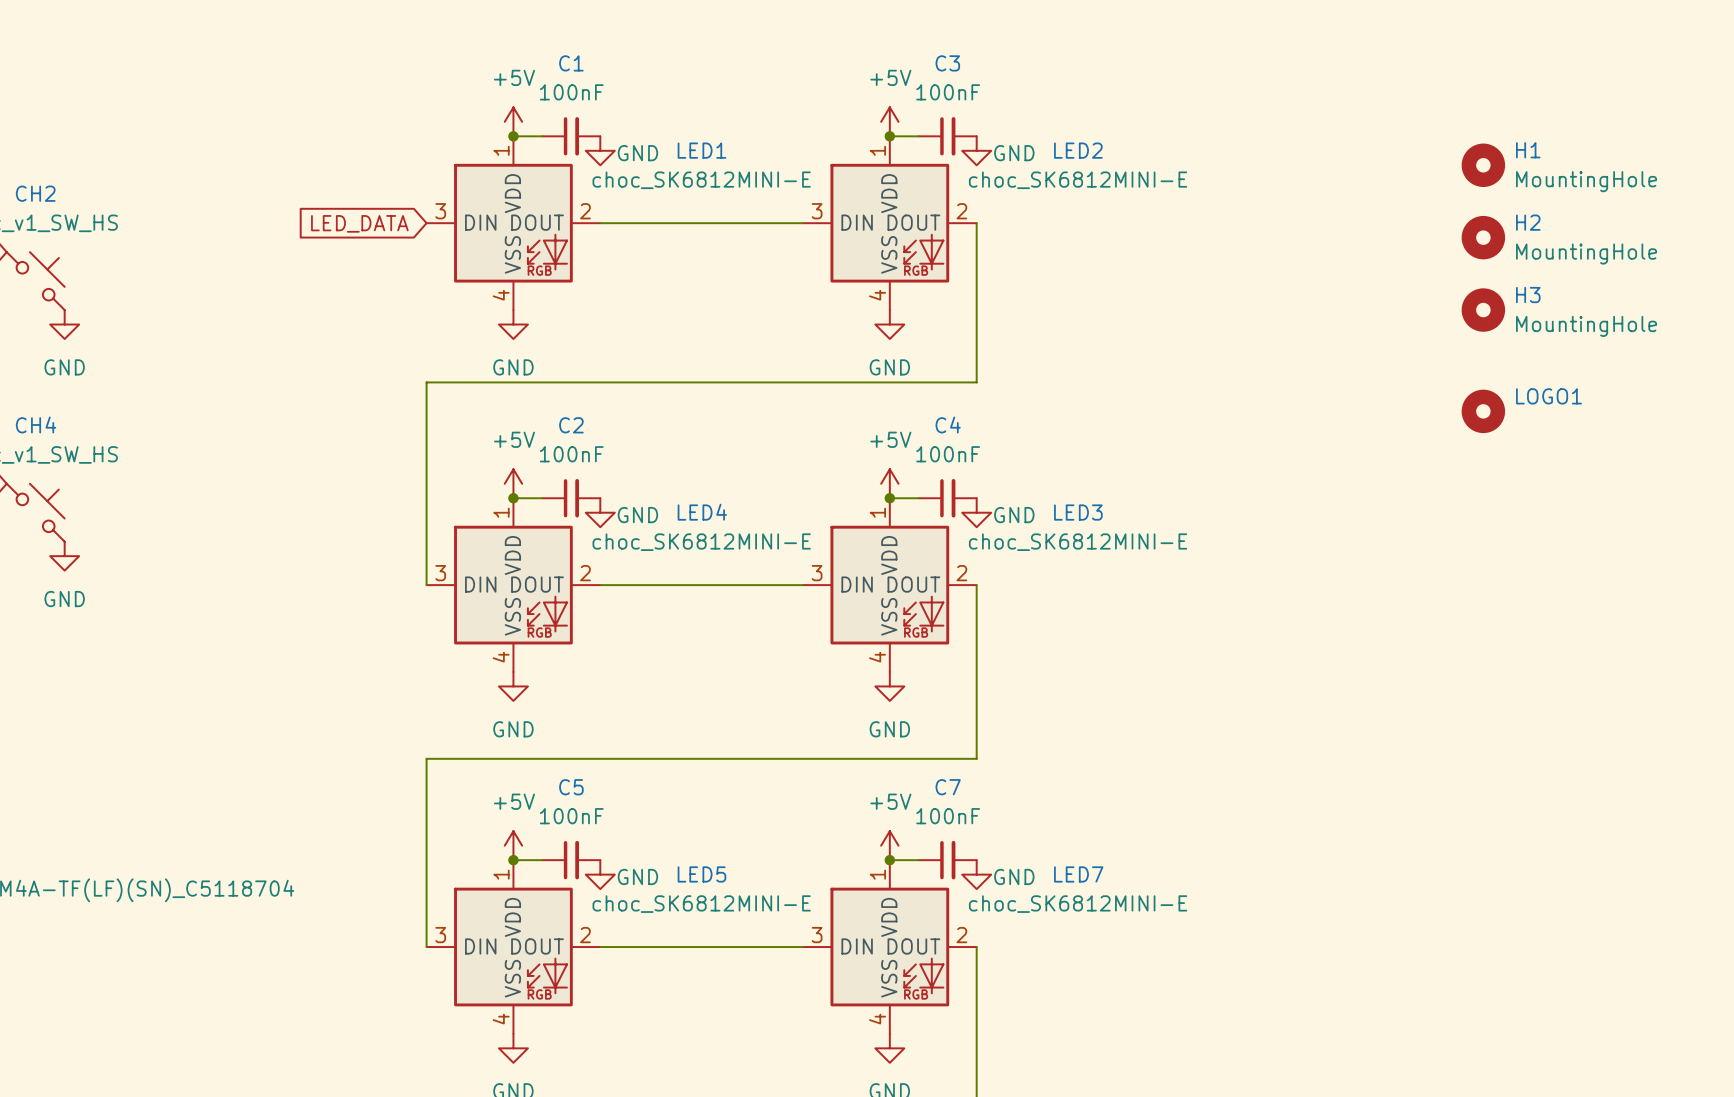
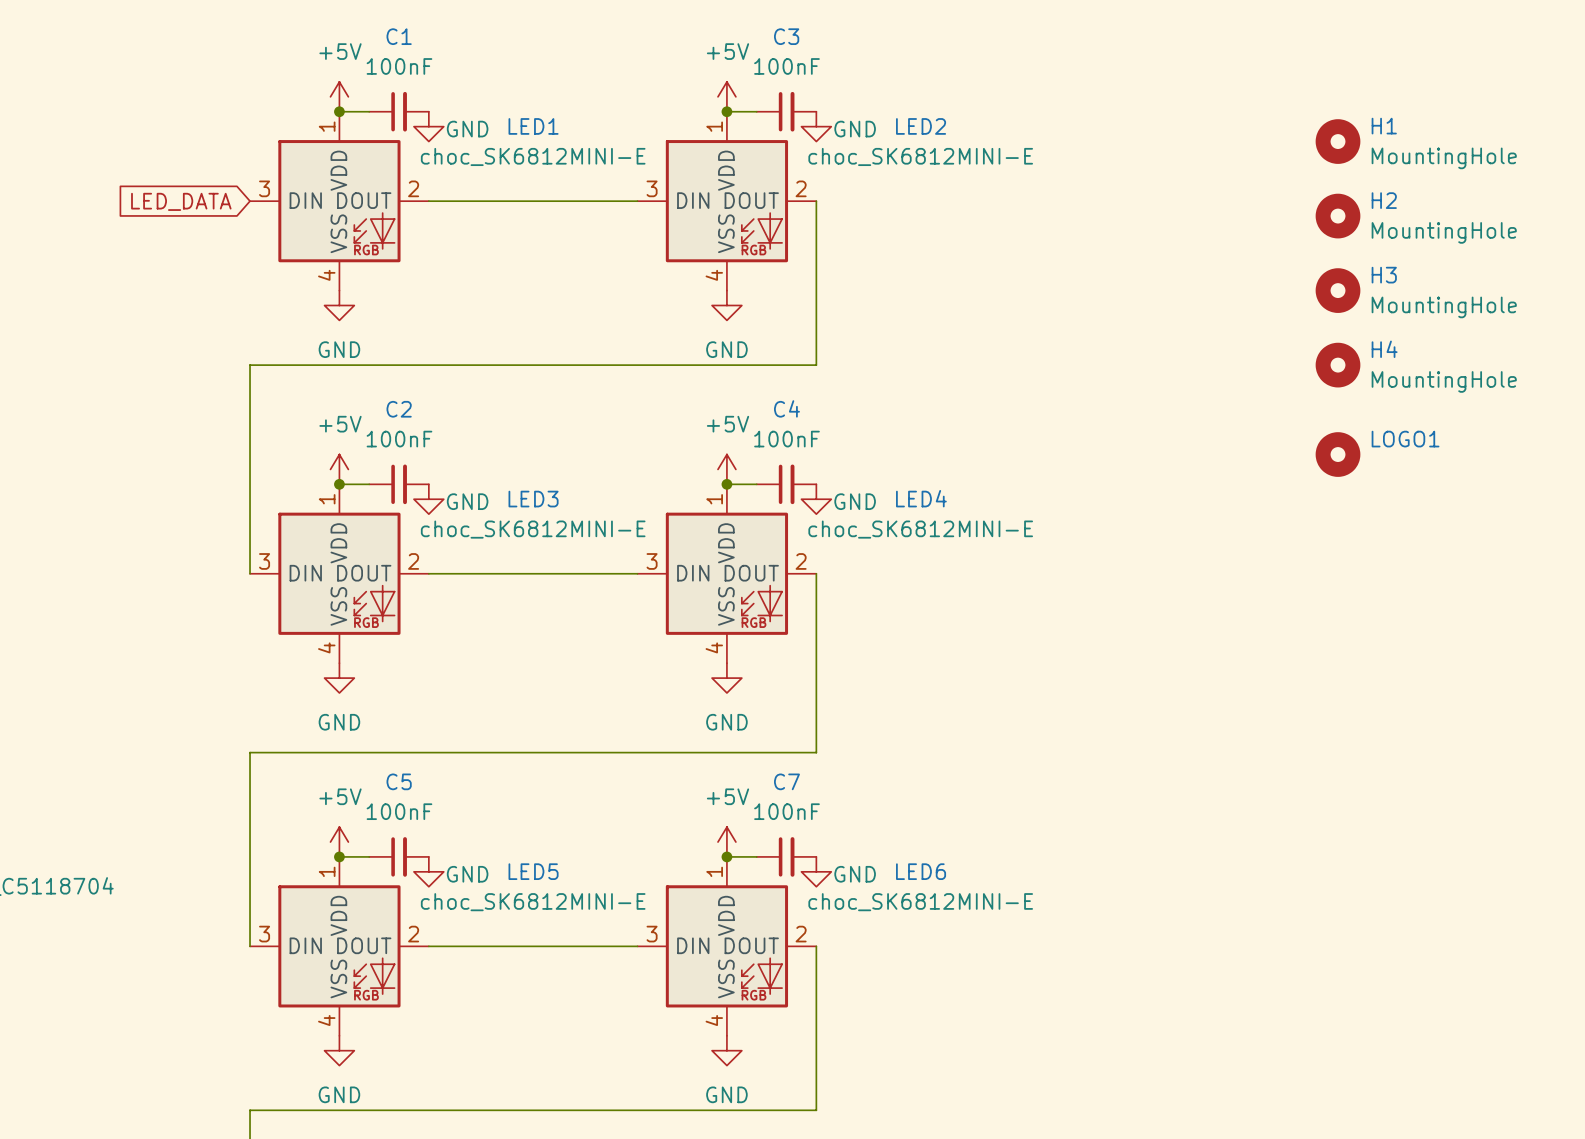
H4: none -> MountingHole (1338, 365)
LOGO1 position: (1483, 411) -> (1338, 454)
LED4 name: LED4 (702, 512) -> LED3 (533, 499)
LED3 name: LED3 (1078, 512) -> LED4 (921, 498)
LED7 name: LED7 (1078, 874) -> LED6 (921, 871)

